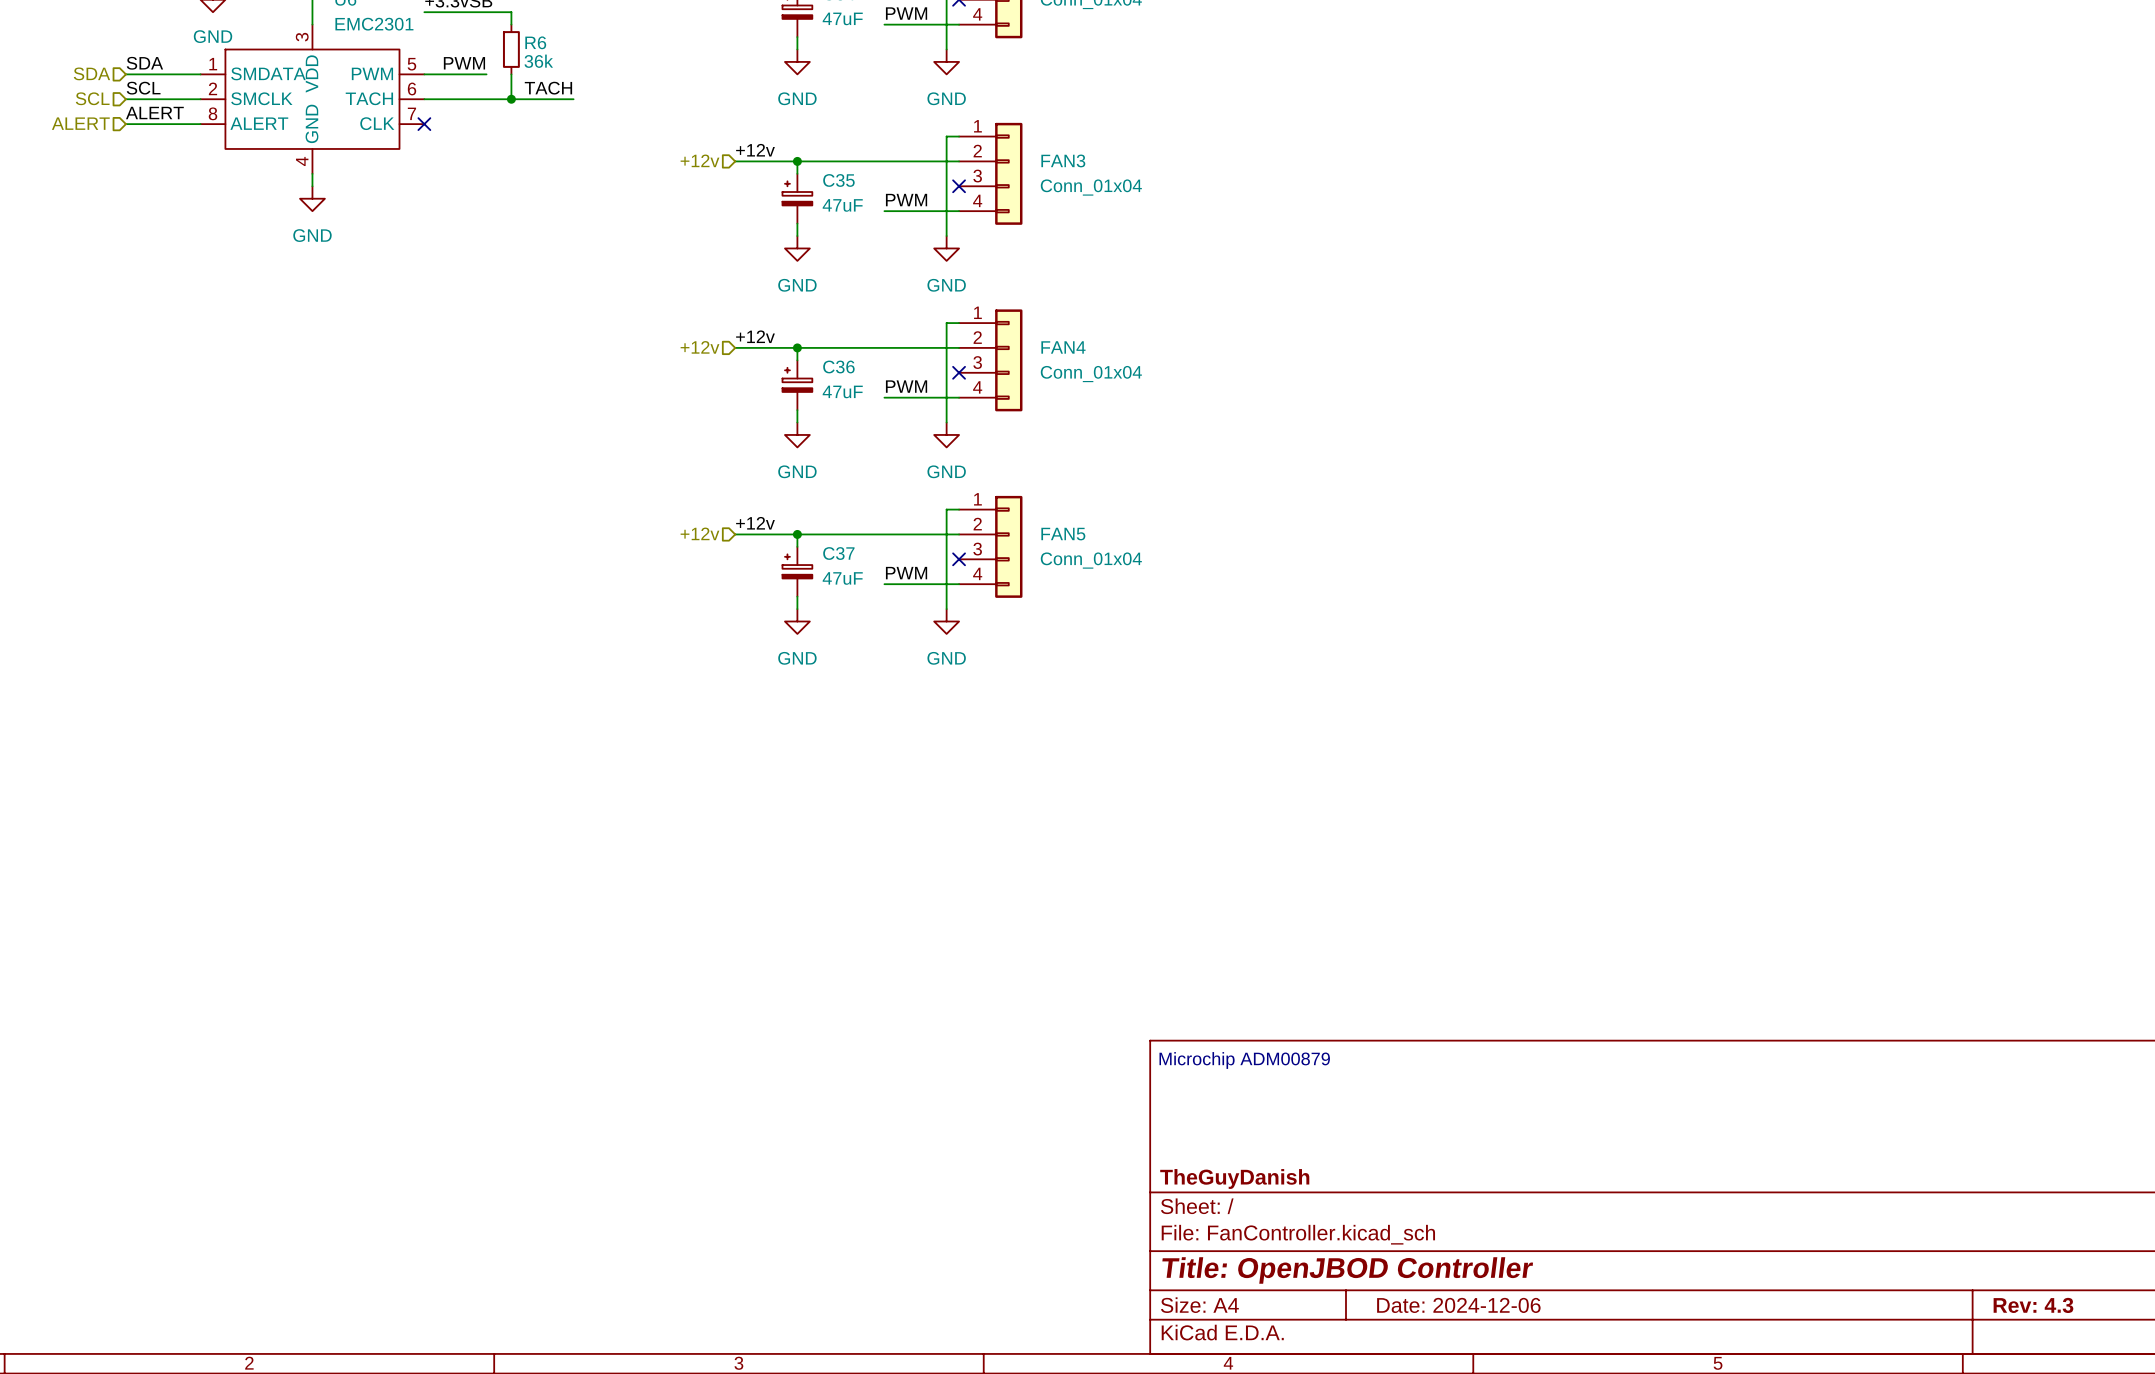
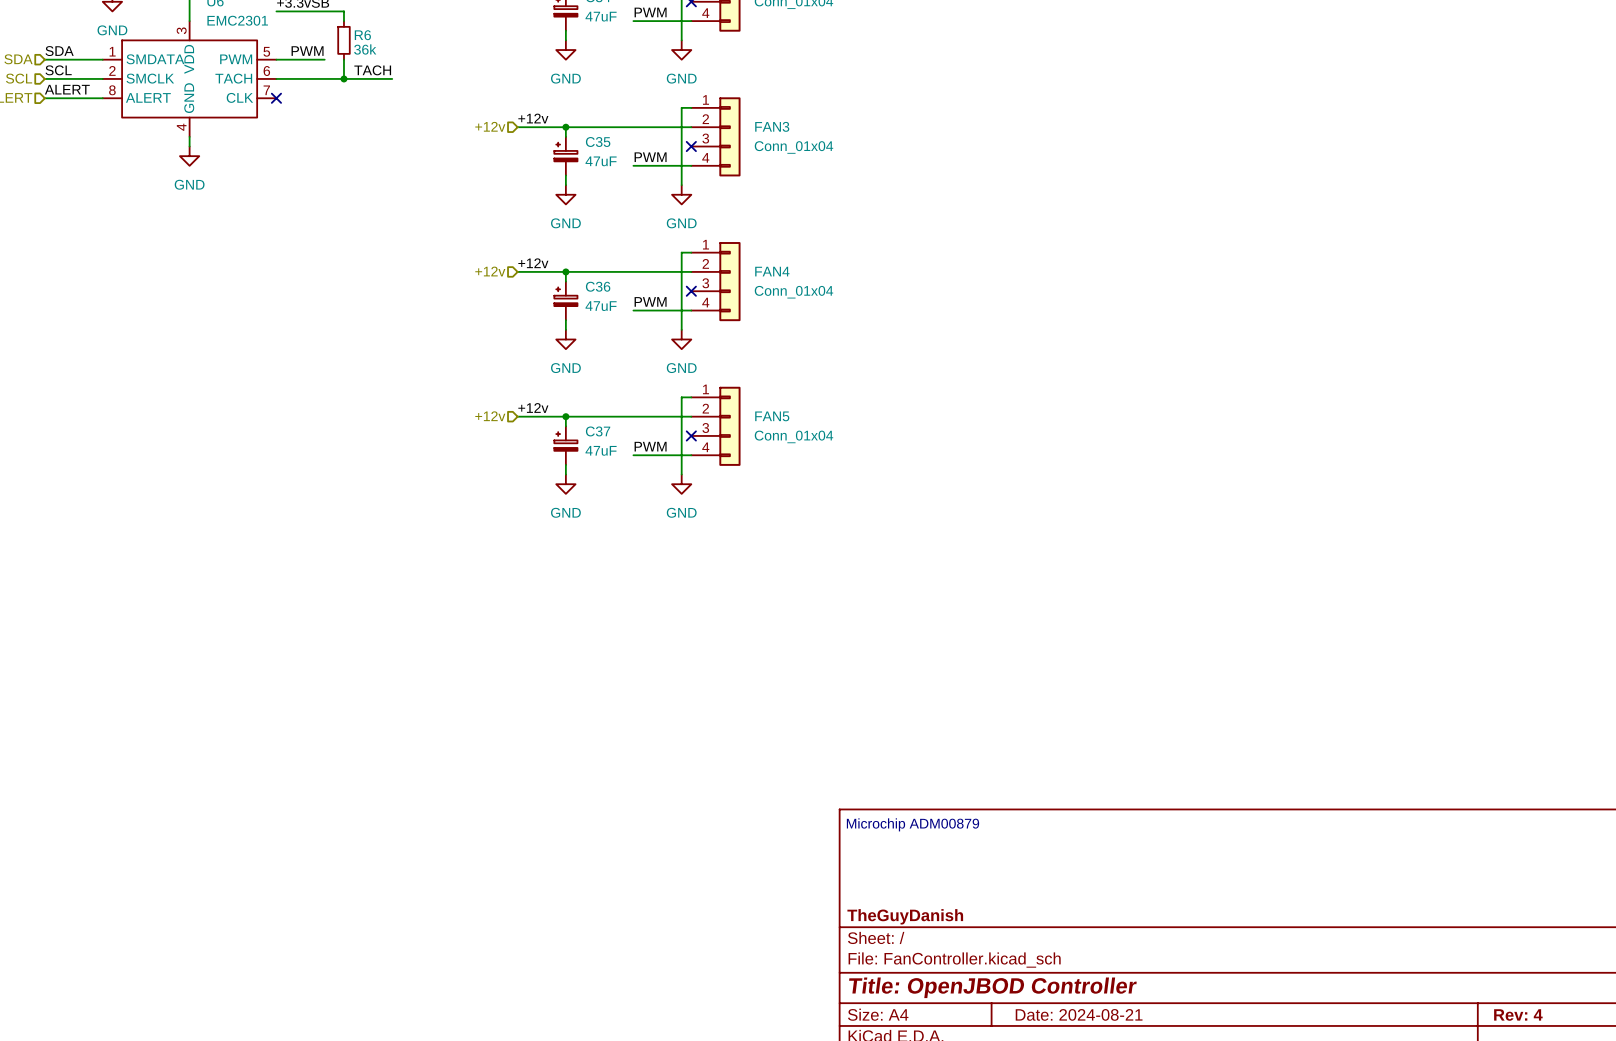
title block: Date: 2024-12-06 (1458, 1305) -> Date: 2024-08-21 (1079, 1014)
title block: Rev: 4.3 (2033, 1305) -> Rev: 4 (1518, 1015)

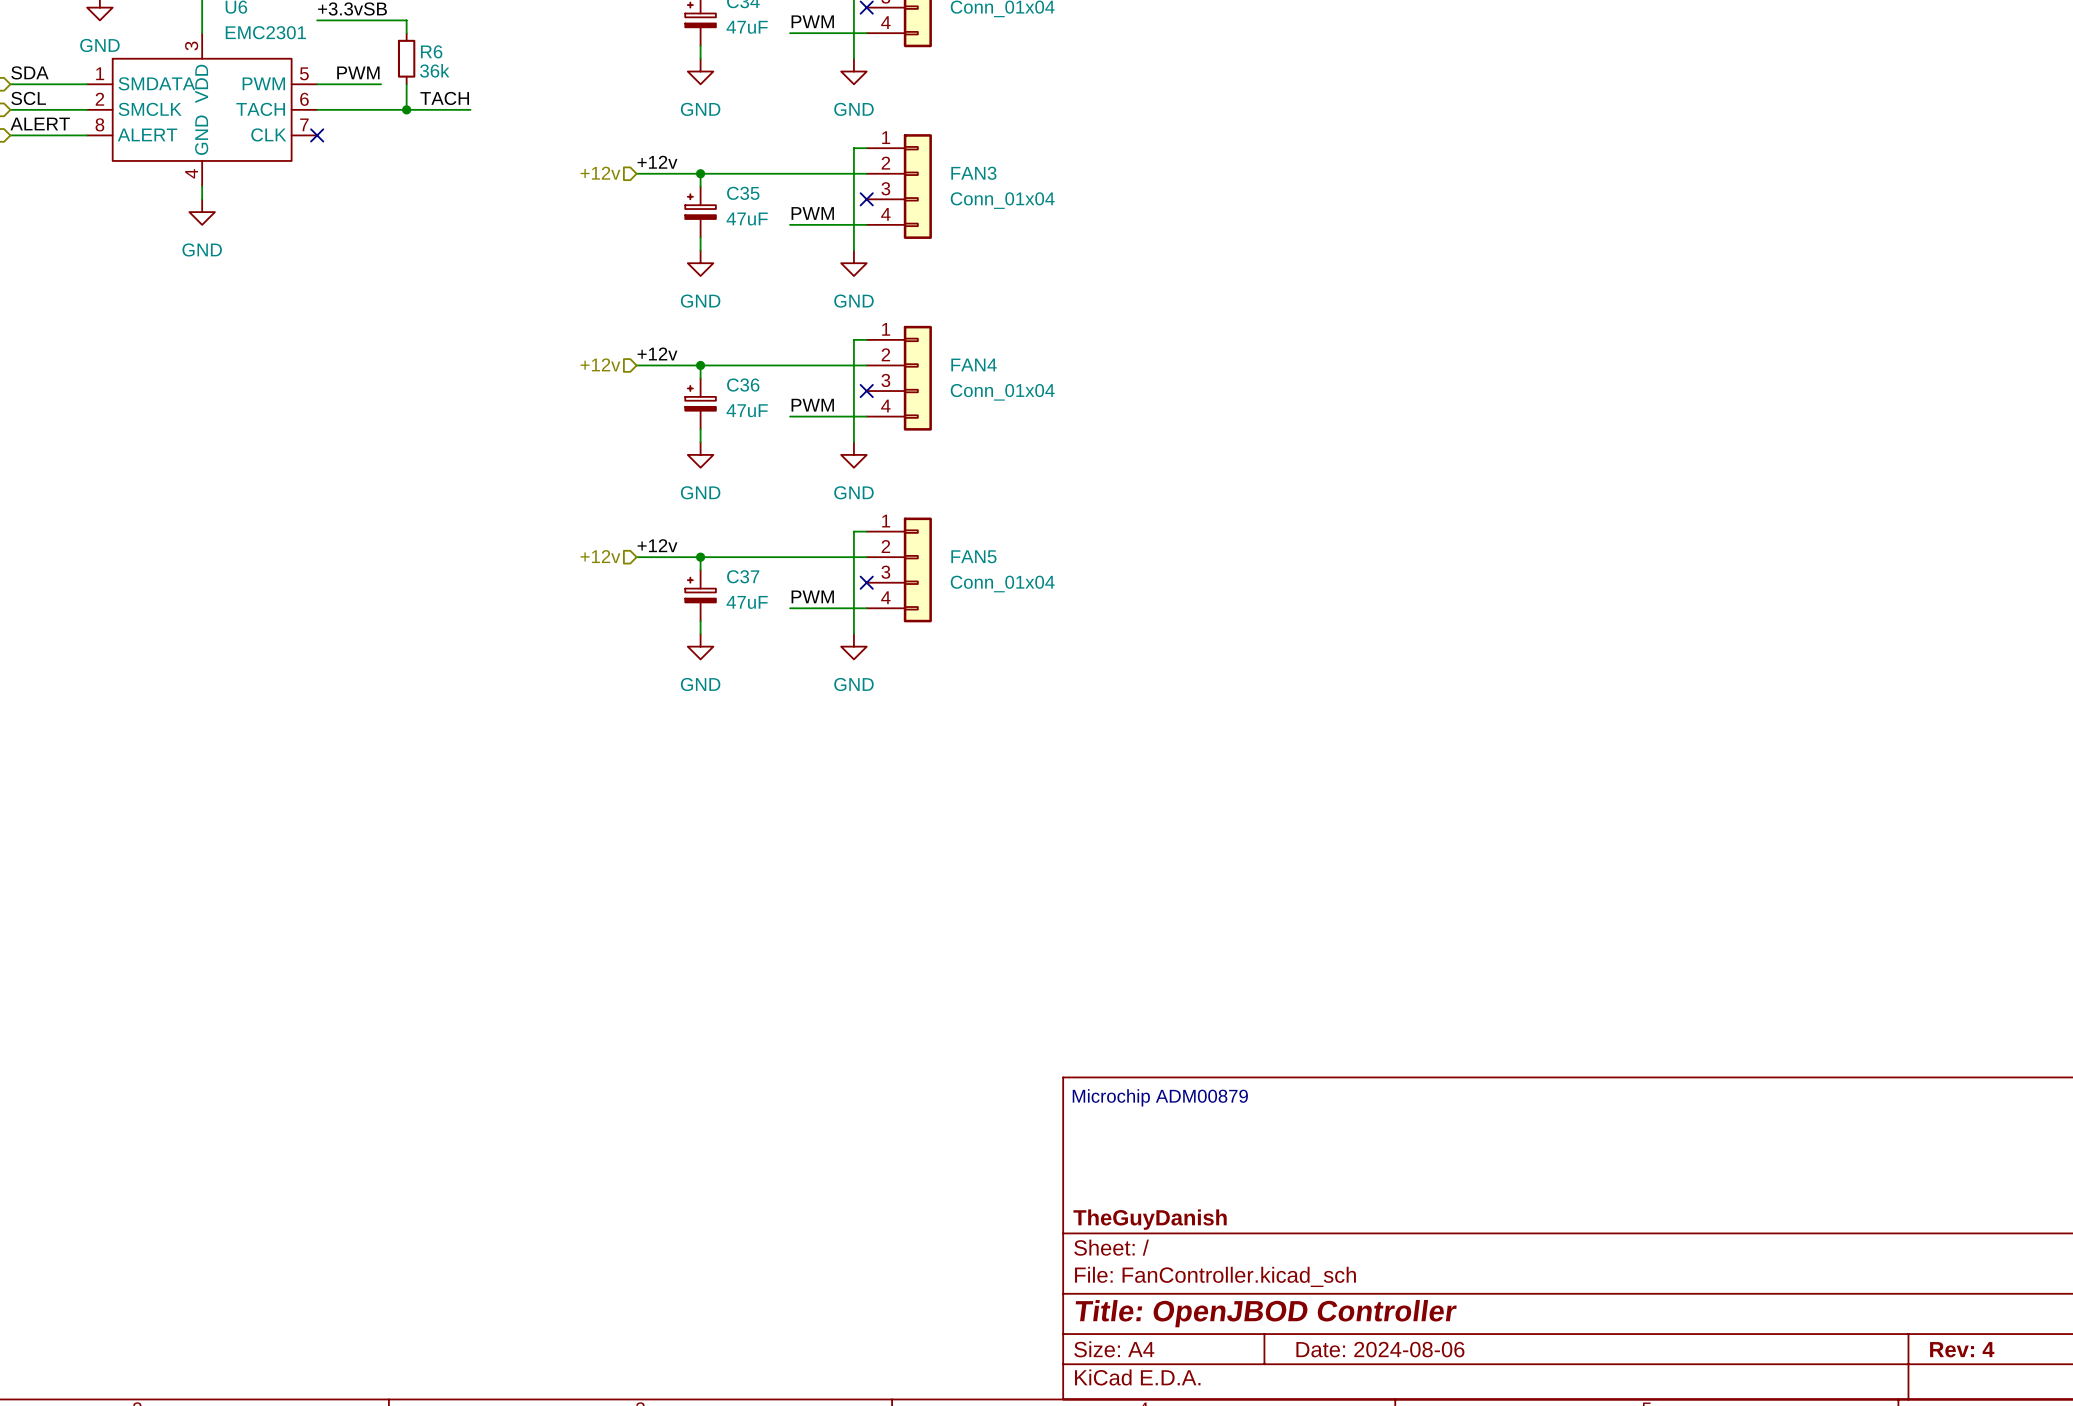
title block: Date: 2024-08-21 (1079, 1014) -> Date: 2024-08-06 (1380, 1349)

